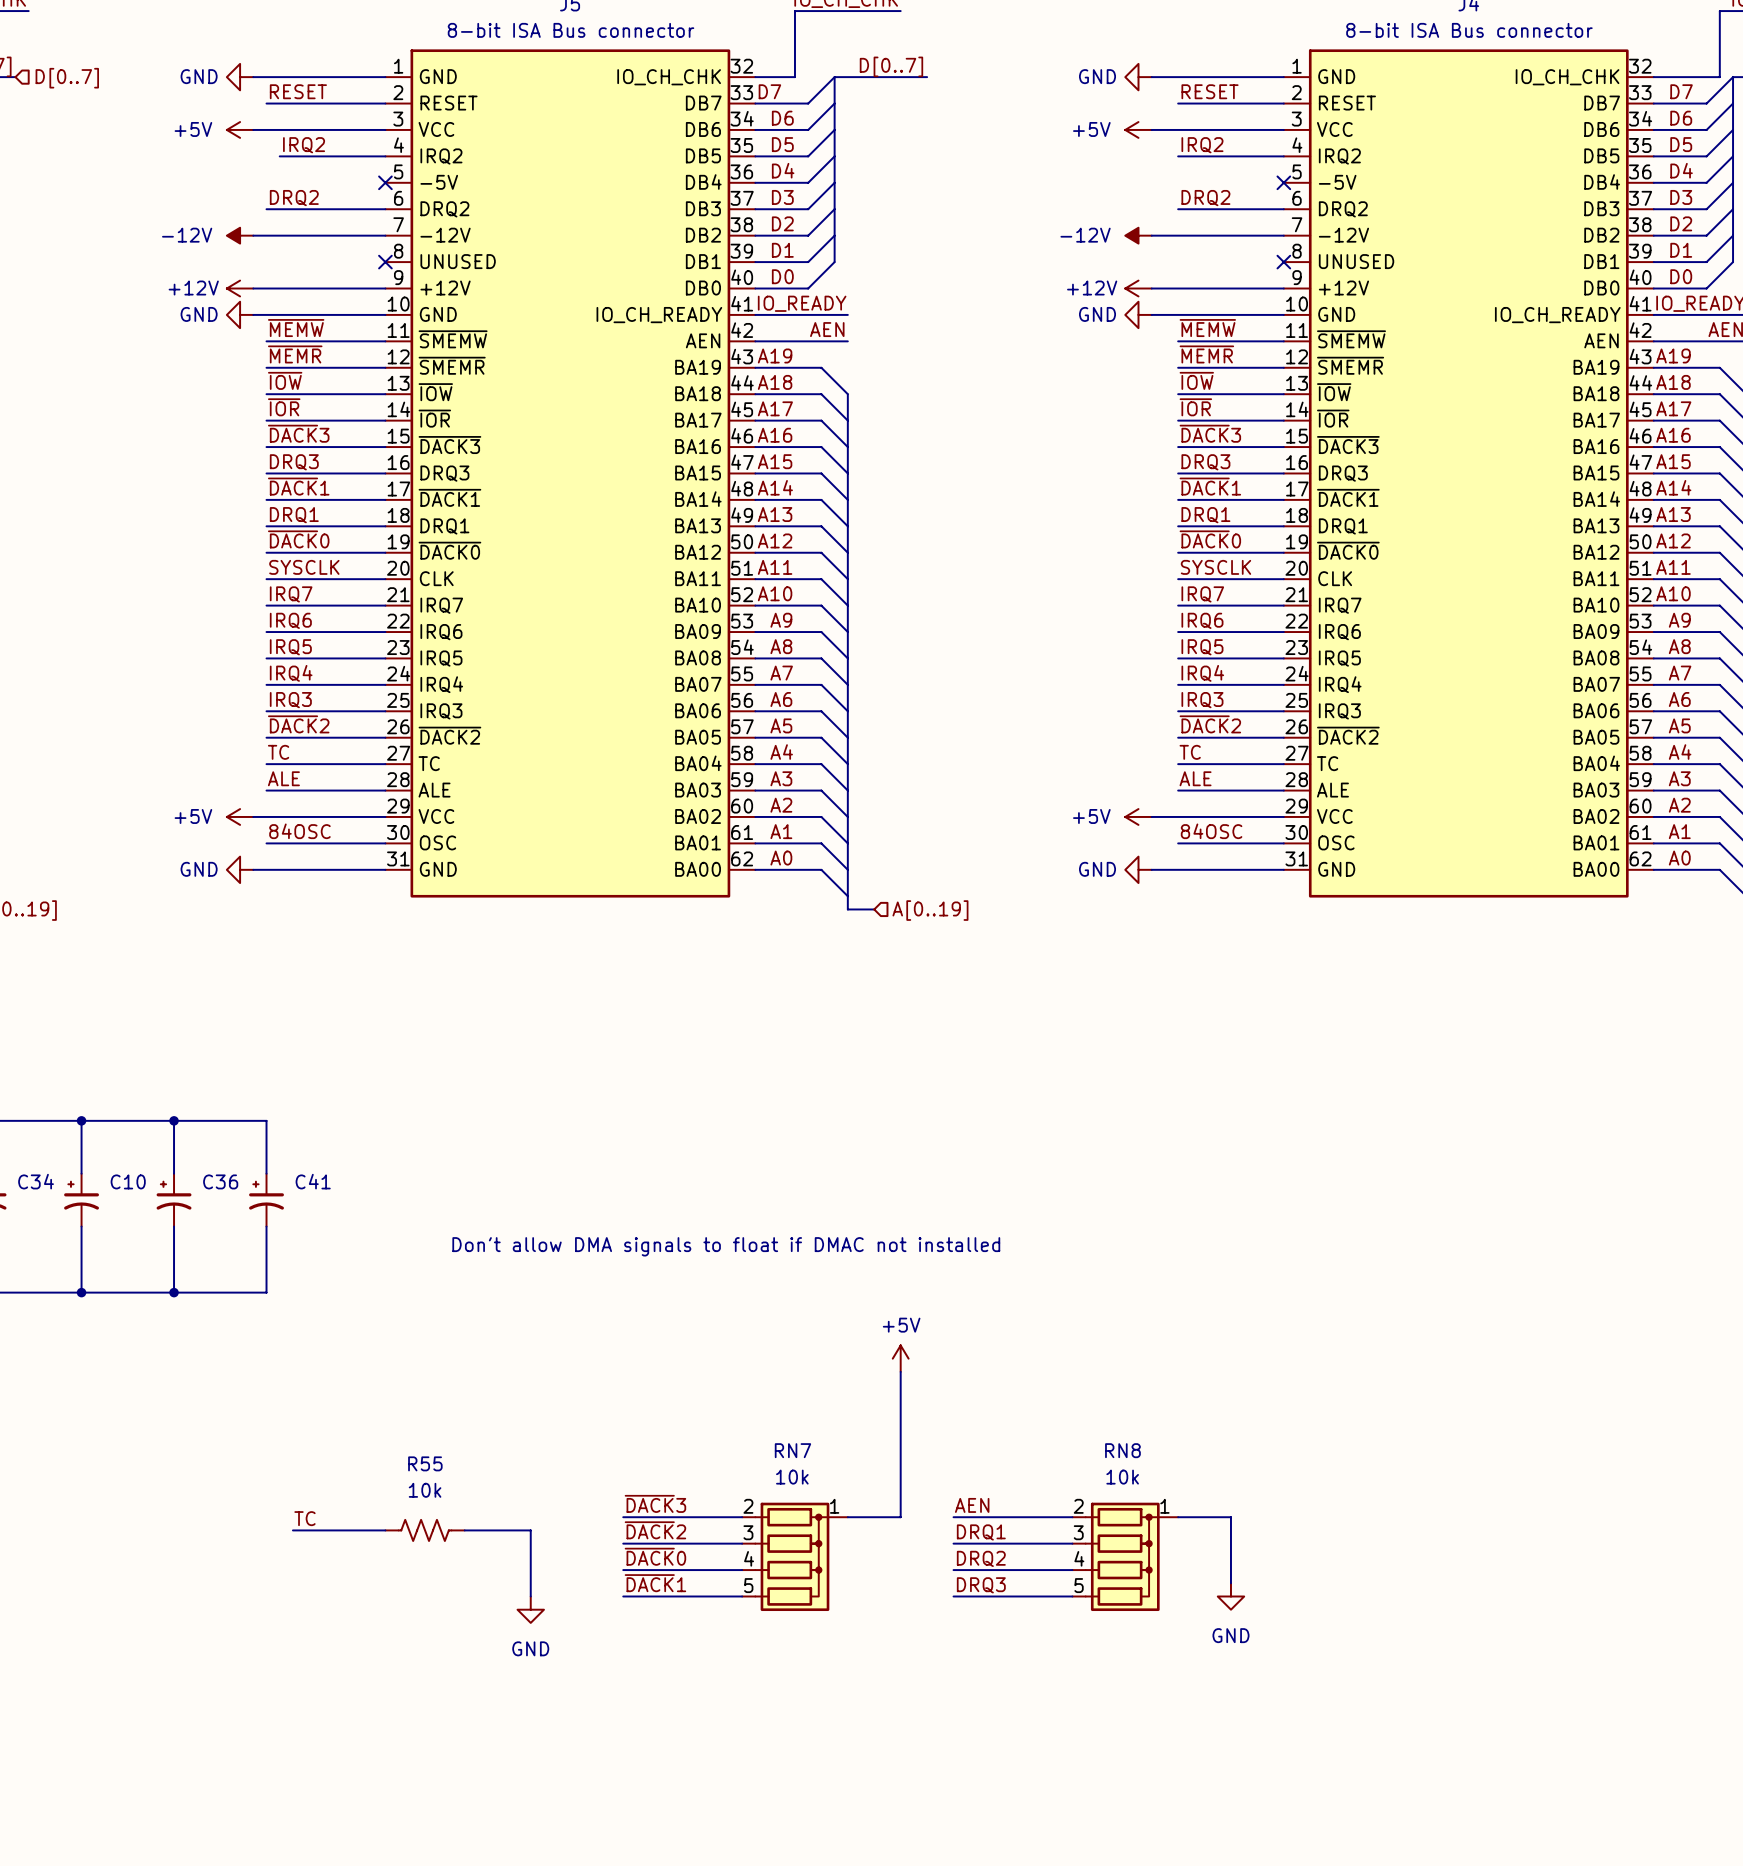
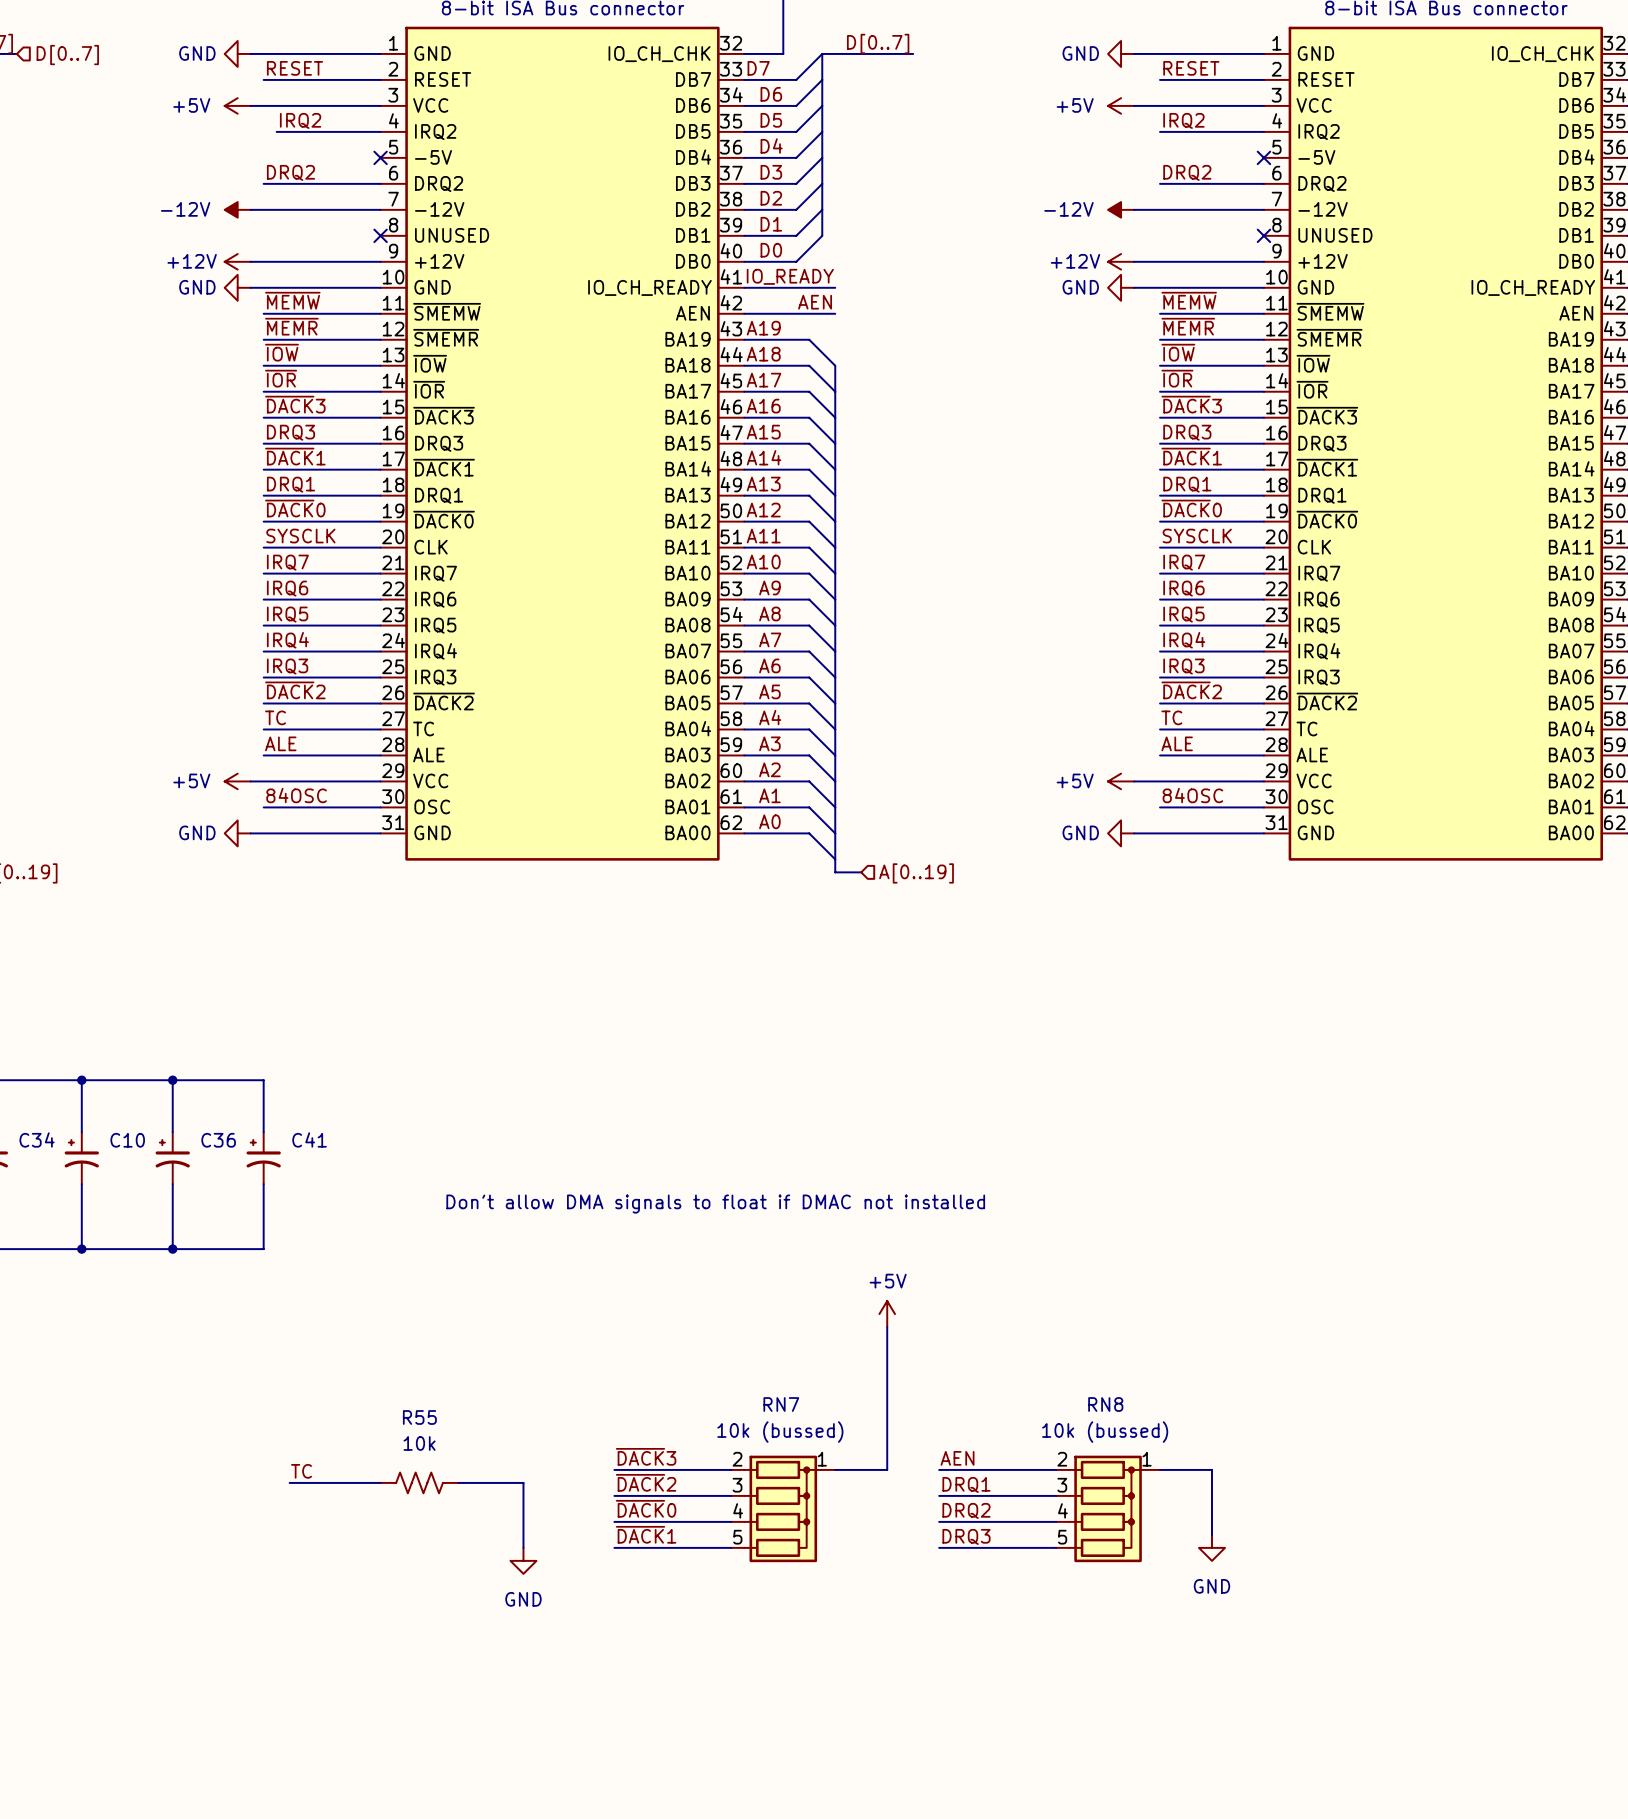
RN7 value: 10k (792, 1477) -> 10k (bussed) (780, 1432)
RN8 value: 10k (1122, 1477) -> 10k (bussed) (1105, 1432)

